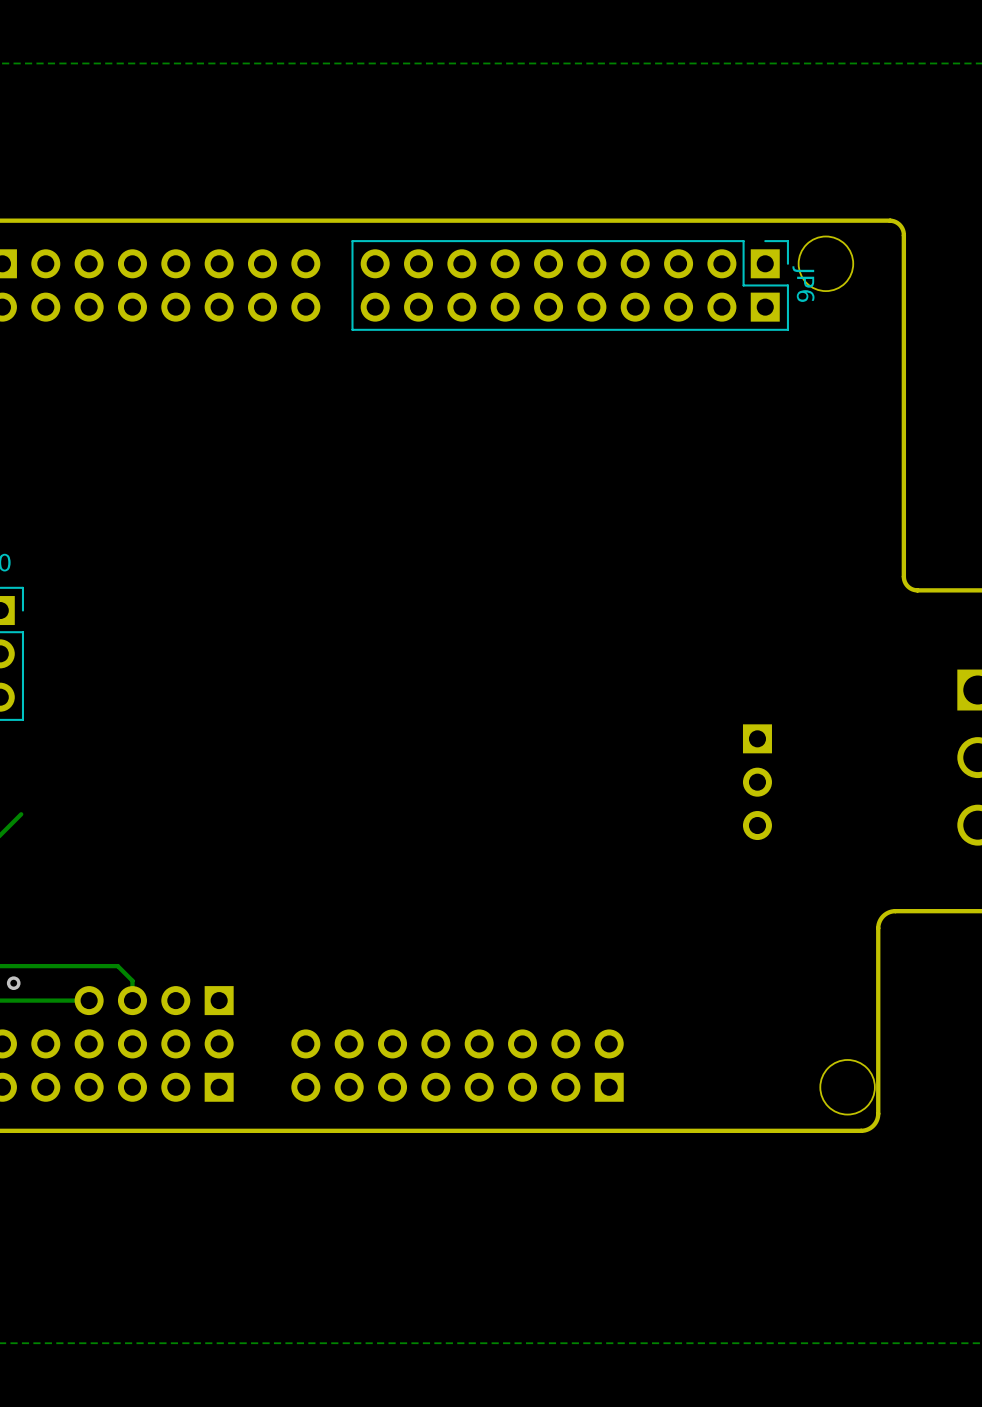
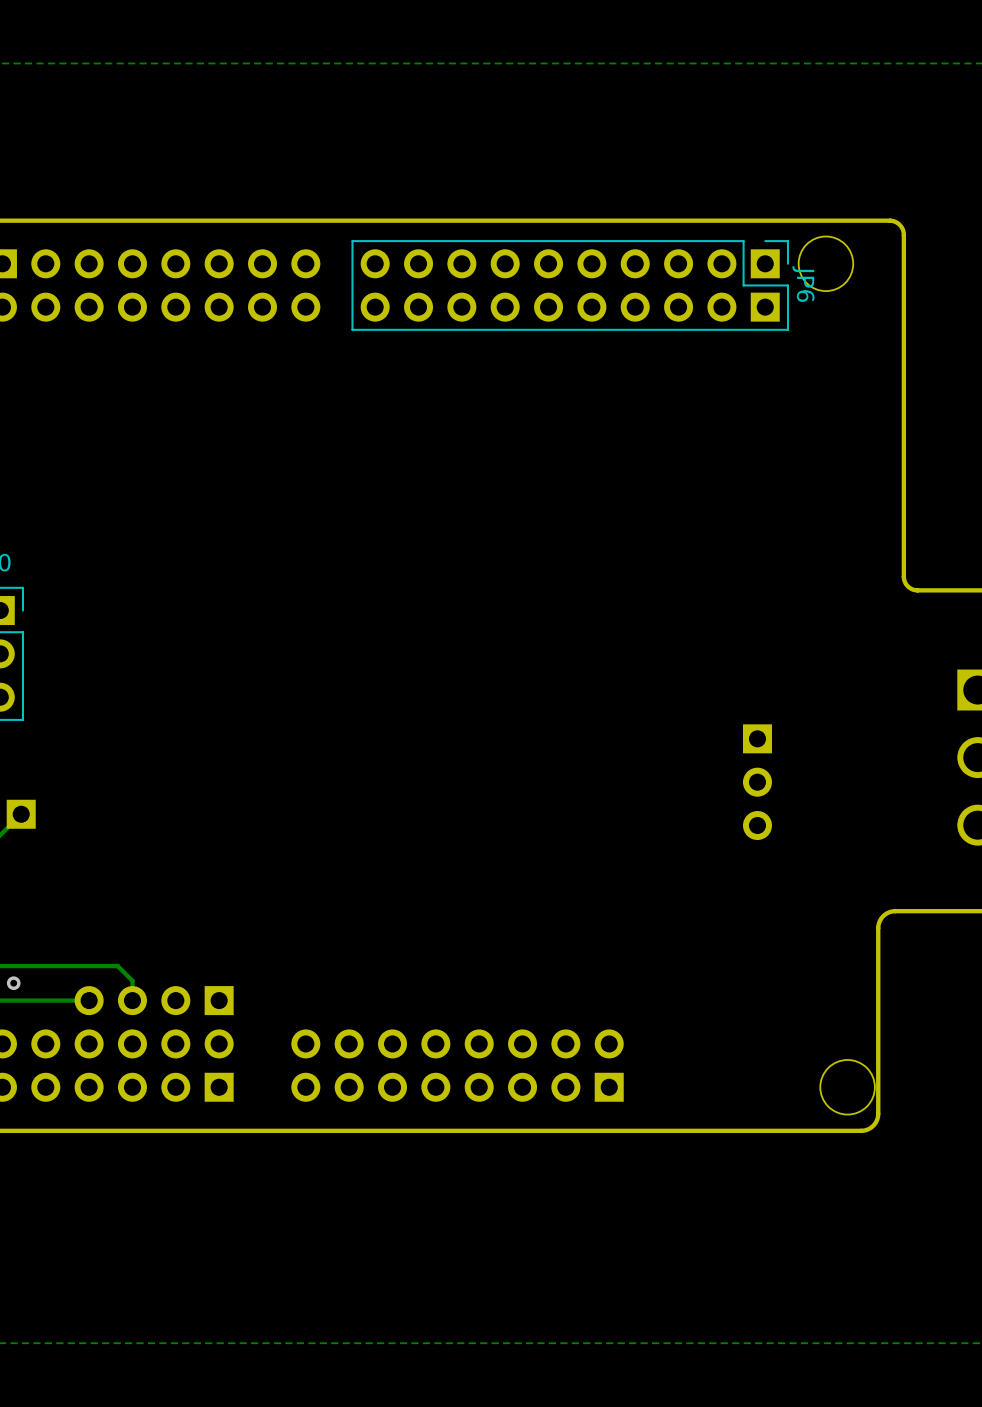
part: none -> (21, 814)

